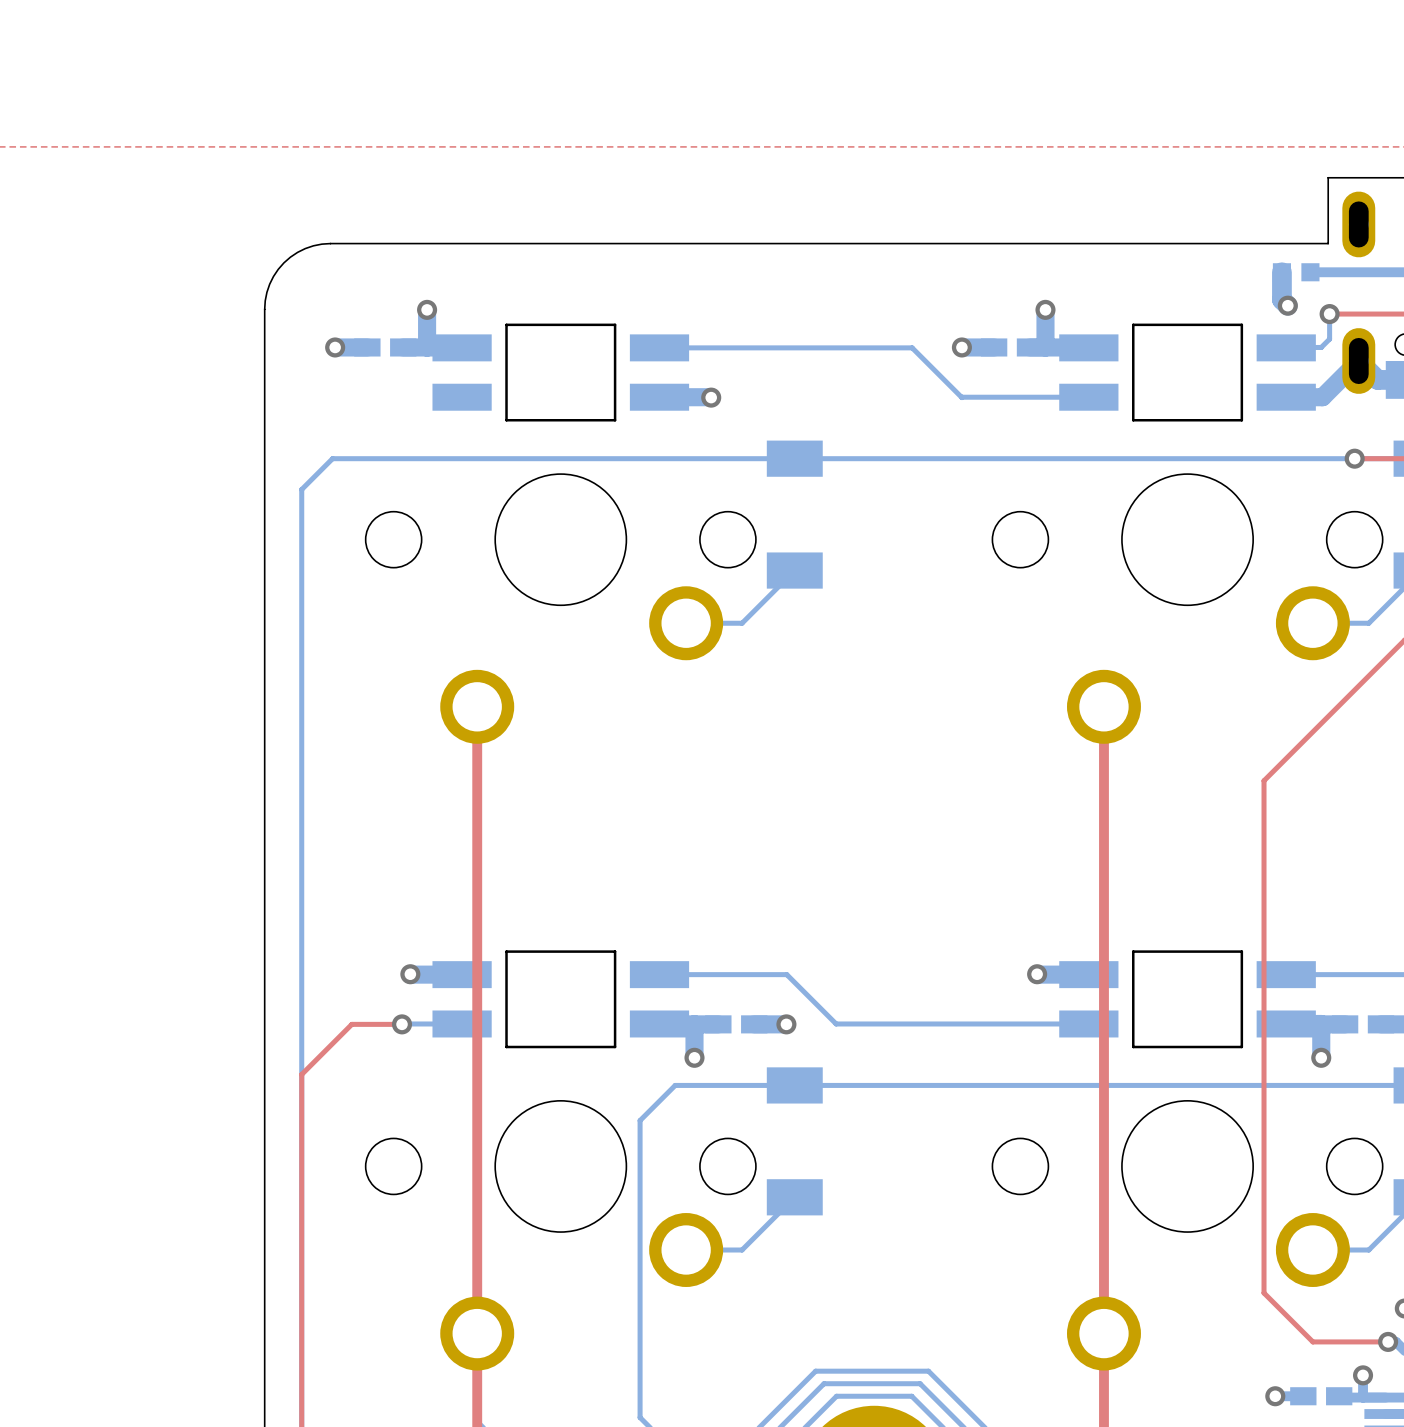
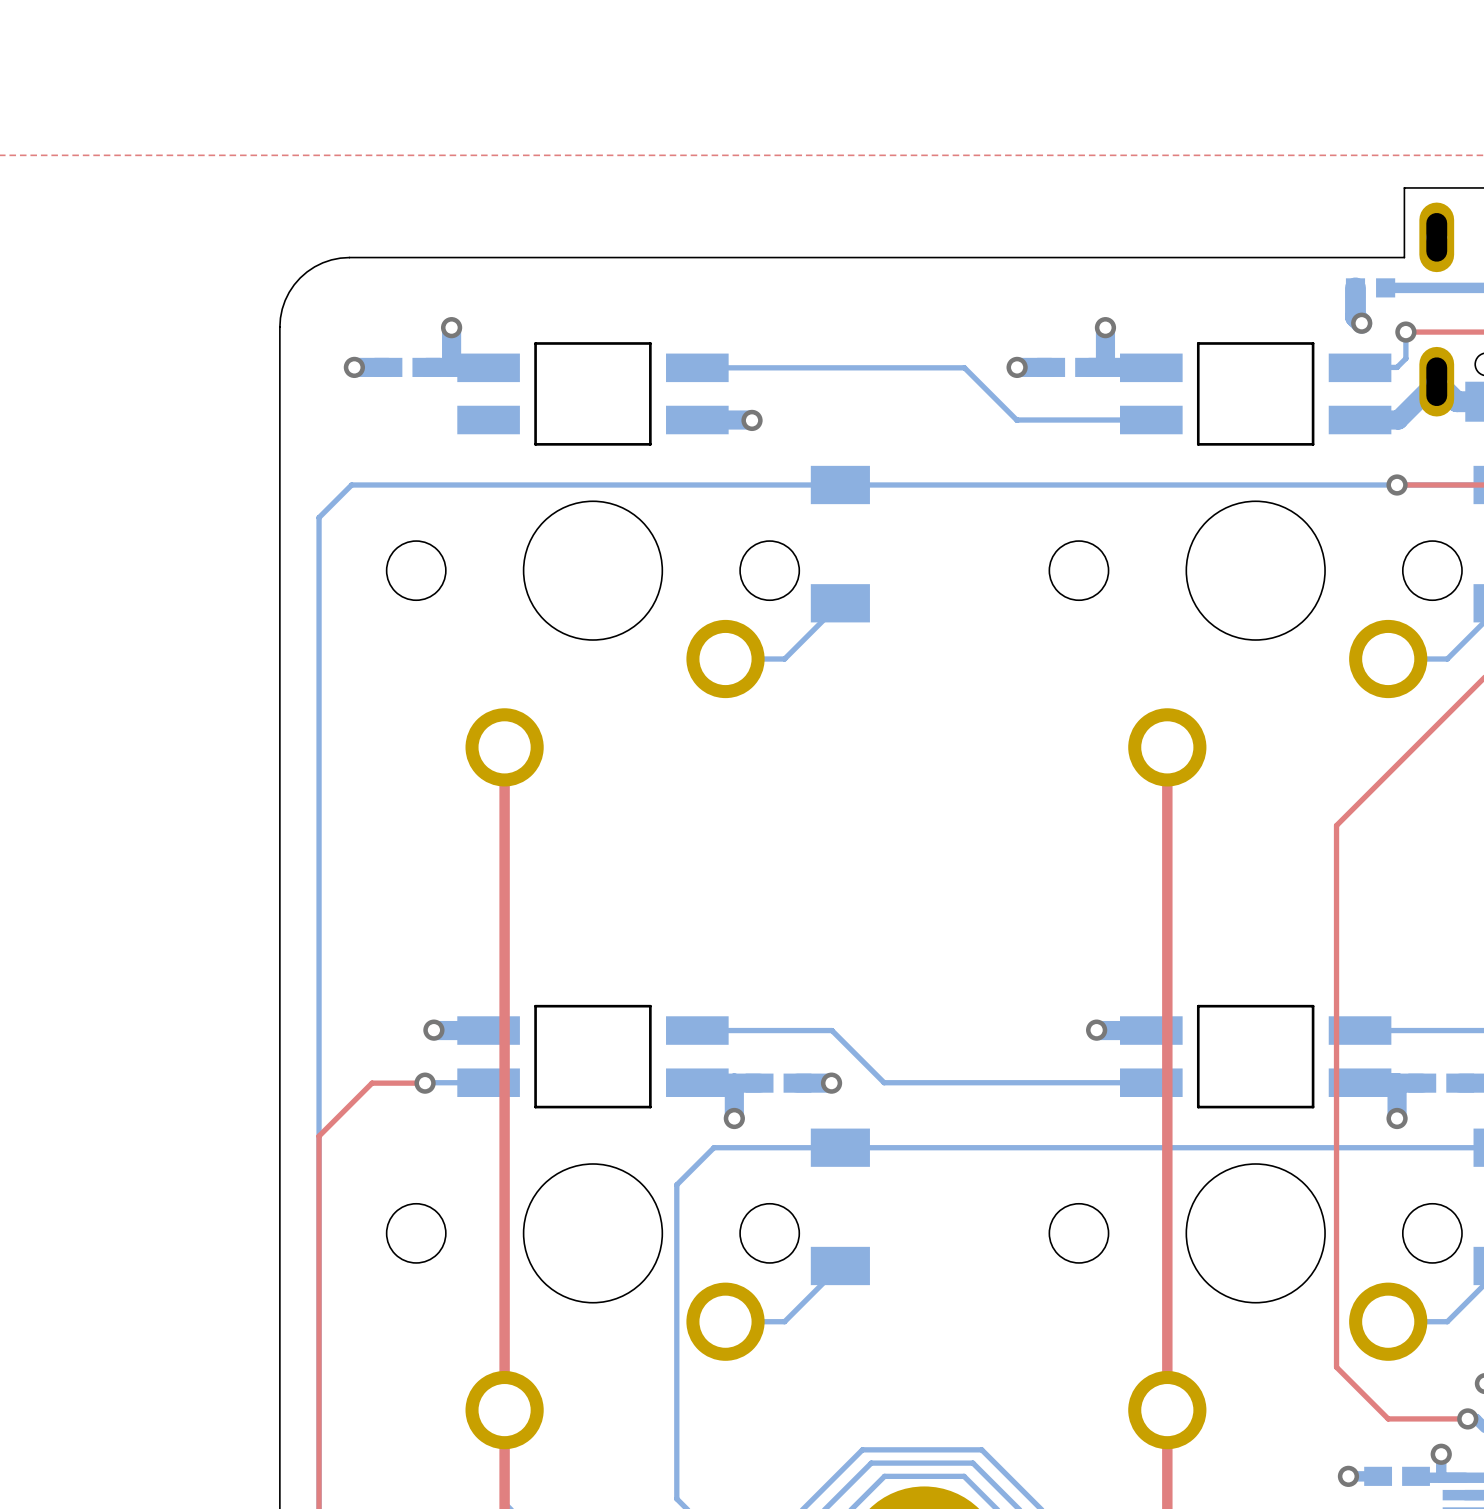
top track: none -> (1397, 484) (1432, 484)
via position: (1354, 458) -> (1397, 484)

